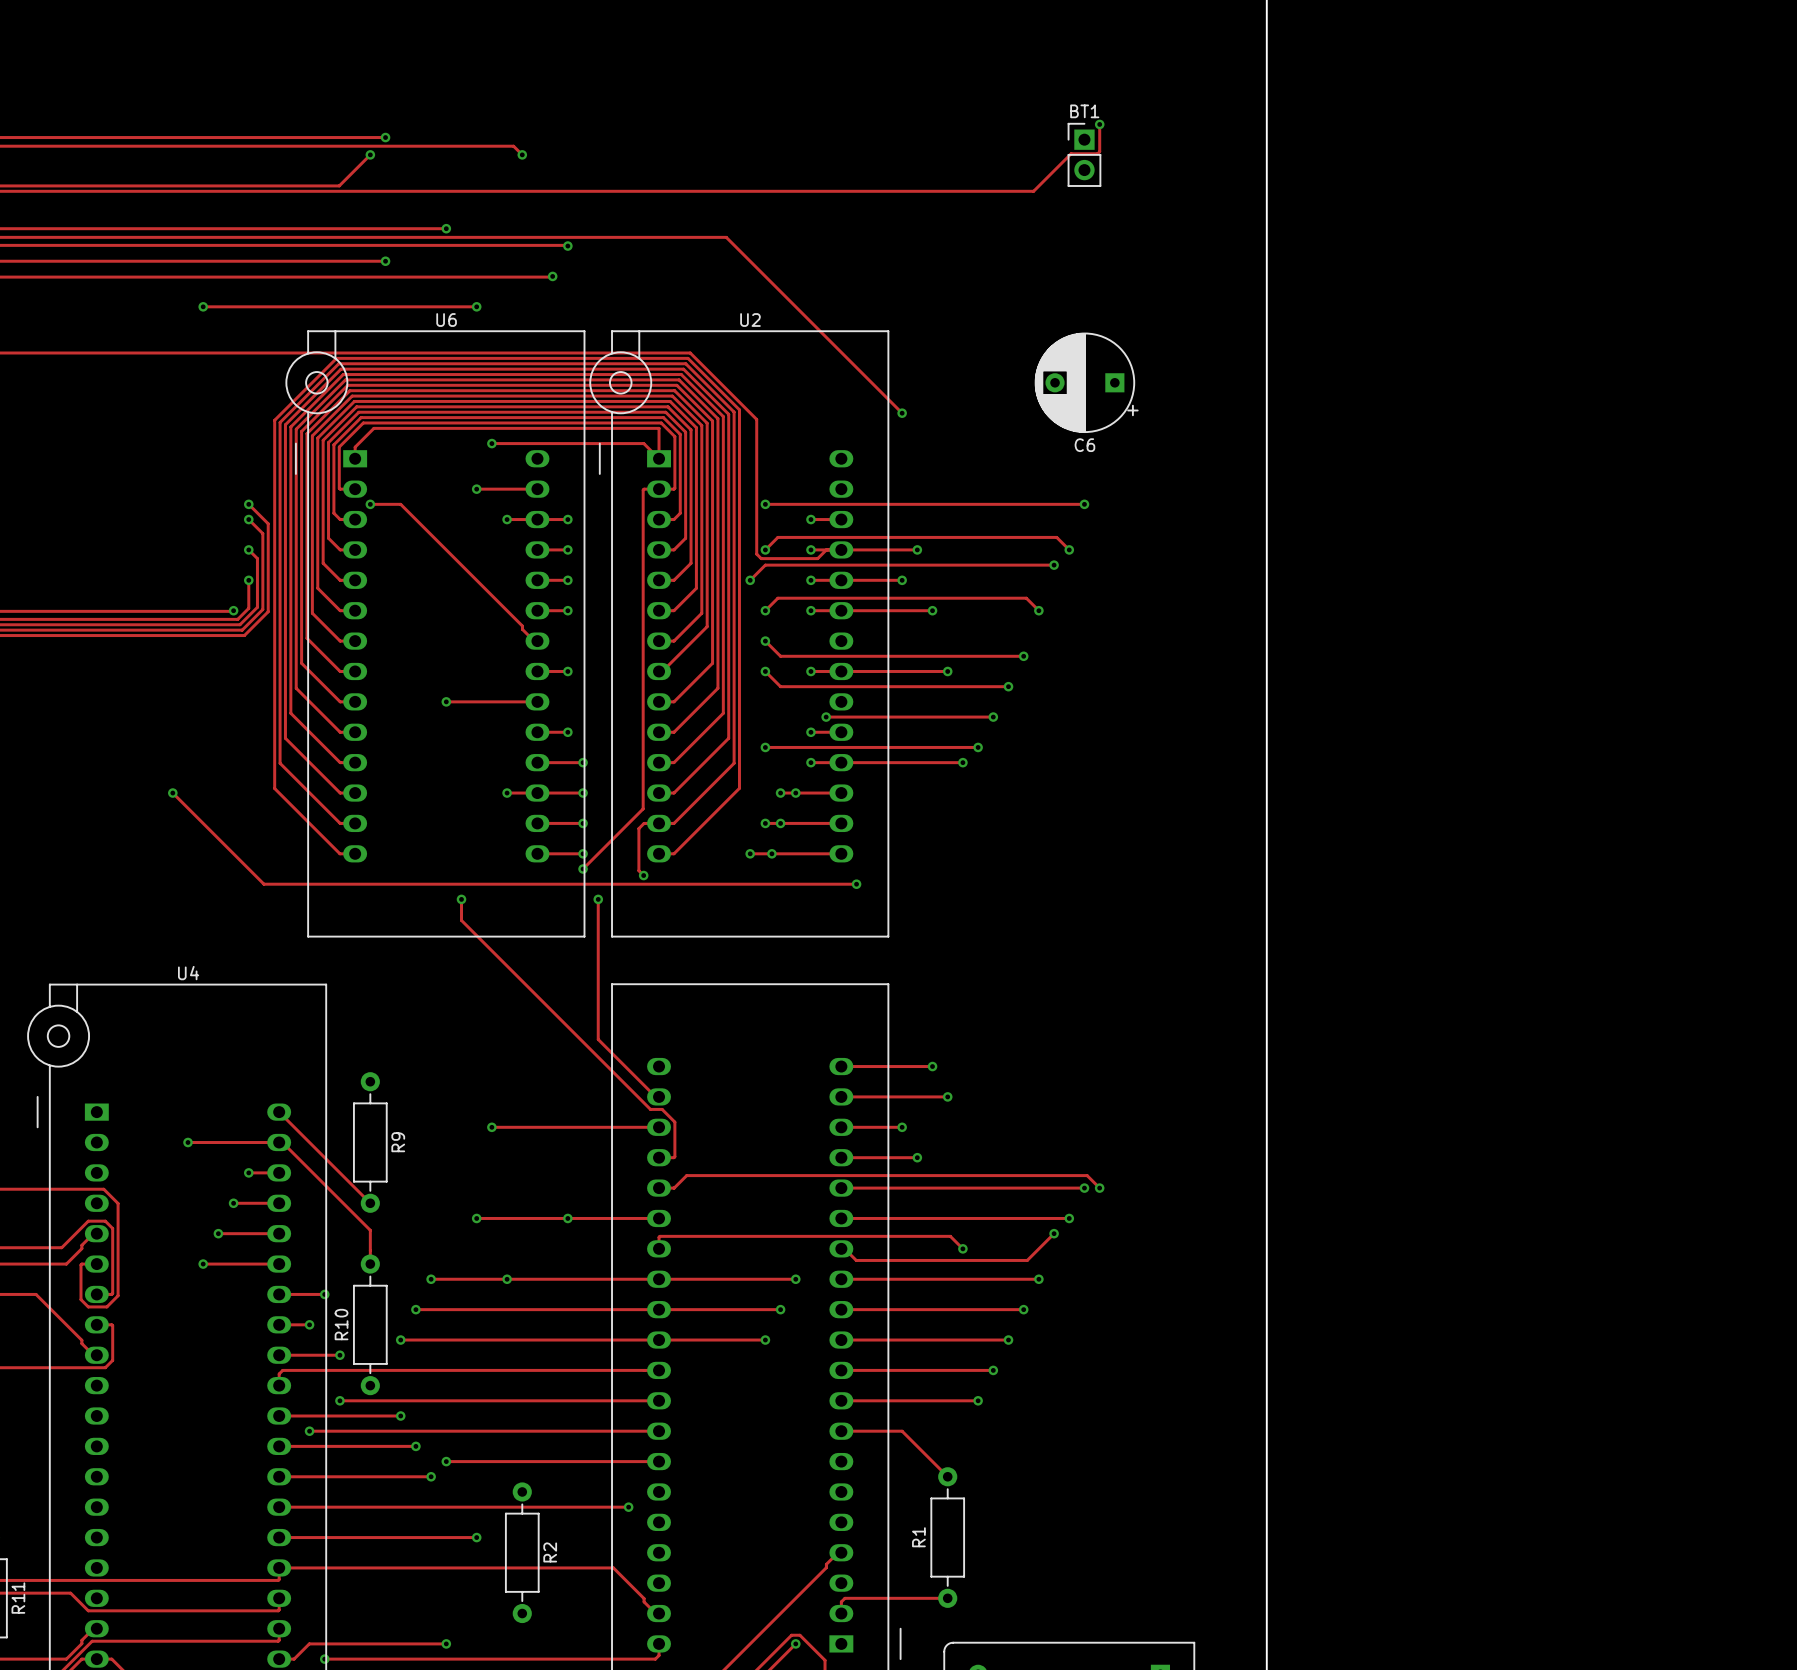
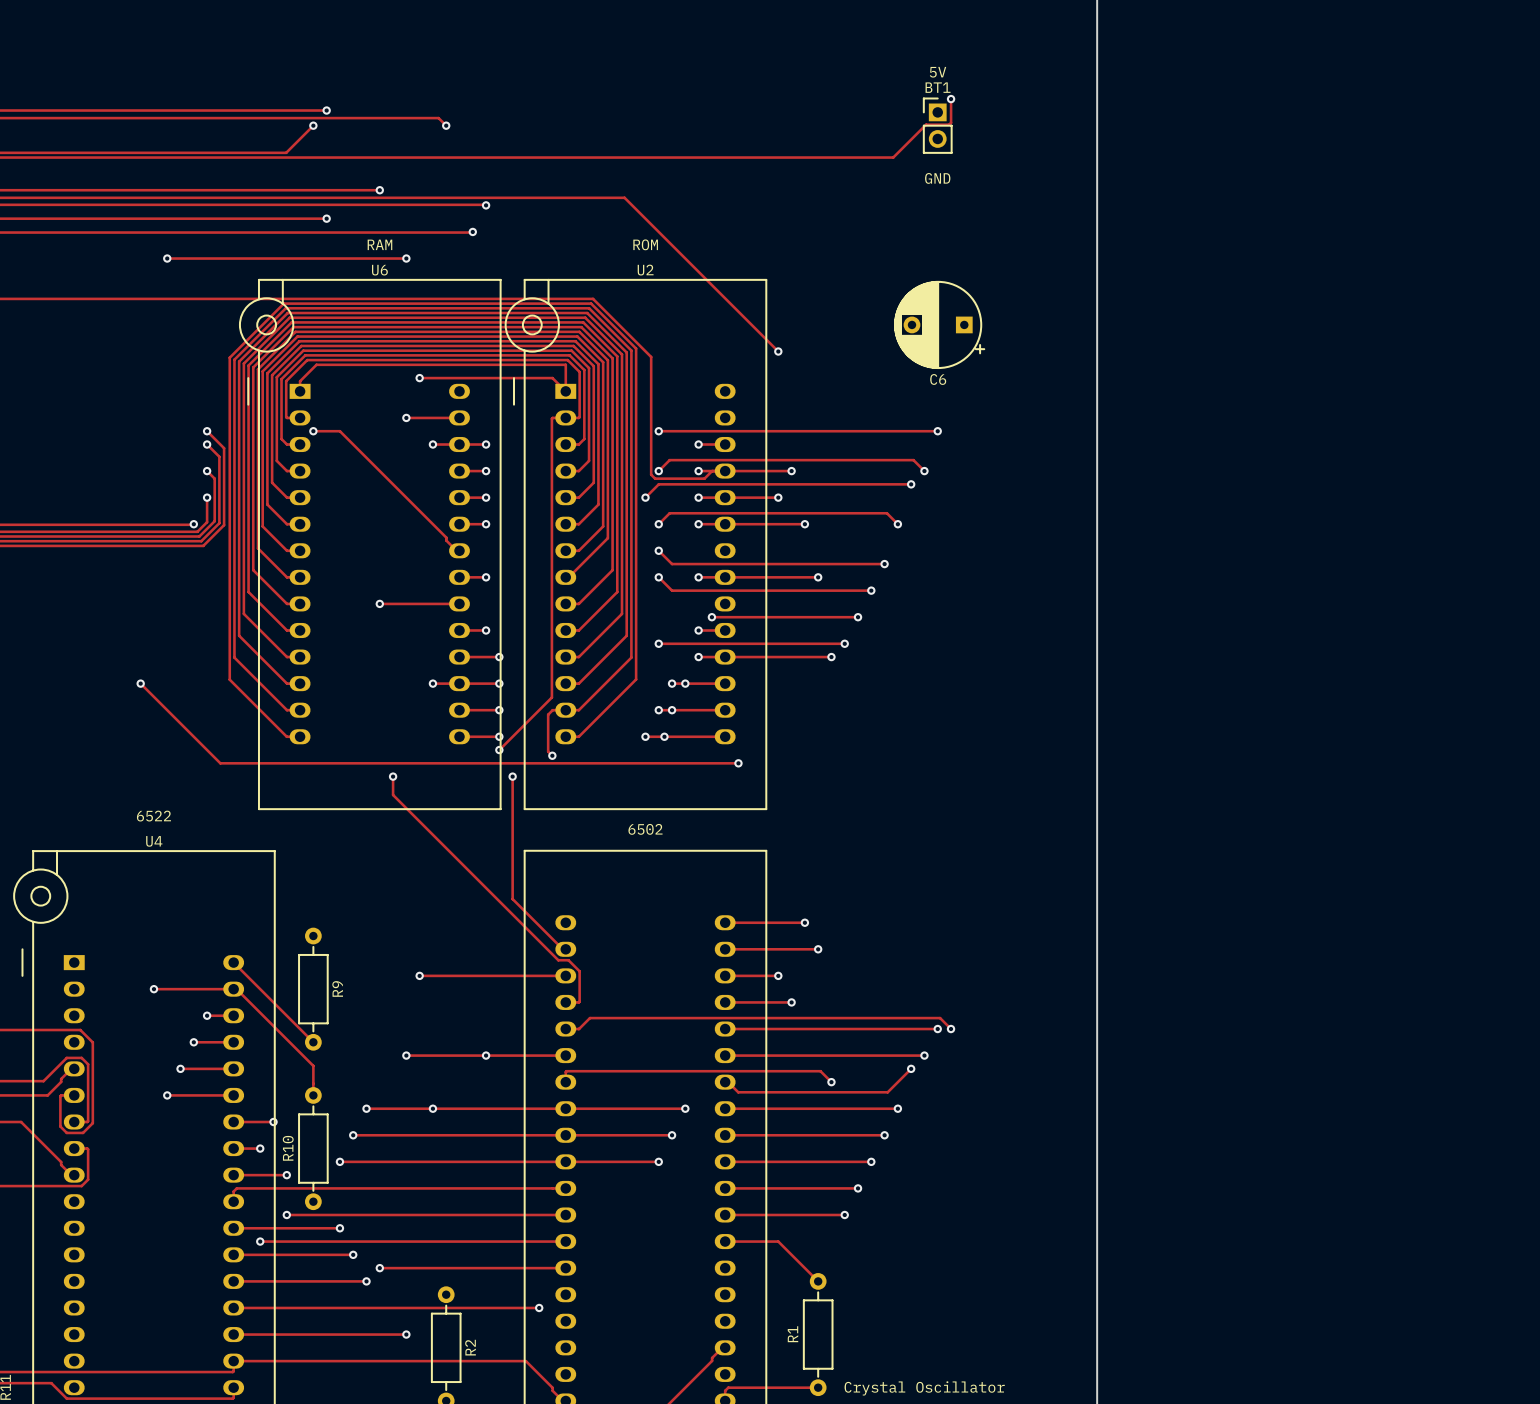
text: none -> 5V (938, 72)
text: none -> GND (937, 178)
text: none -> RAM (379, 244)
text: none -> ROM (645, 244)
text: none -> 6522 (153, 816)
text: none -> 6502 (645, 829)
text: none -> Crystal Oscillator (924, 1388)

